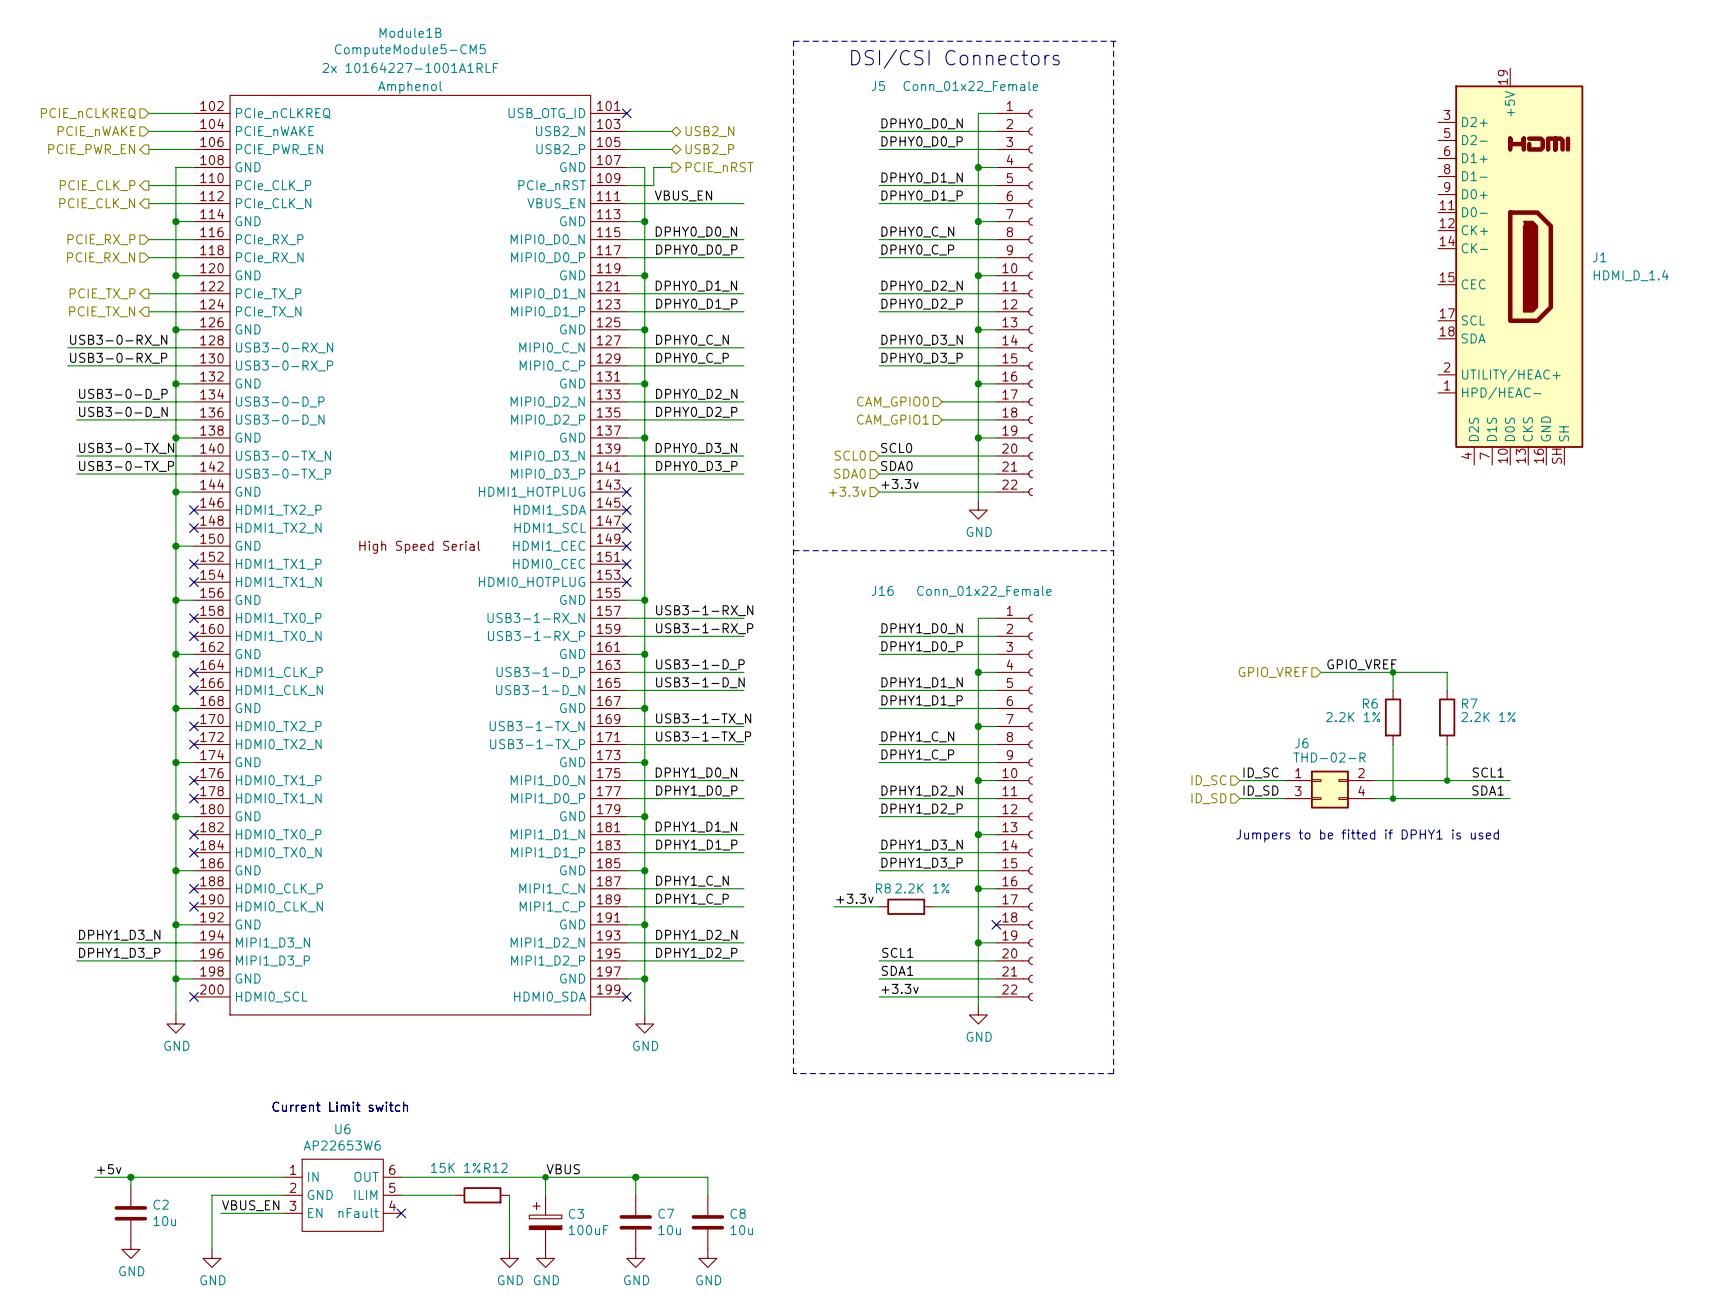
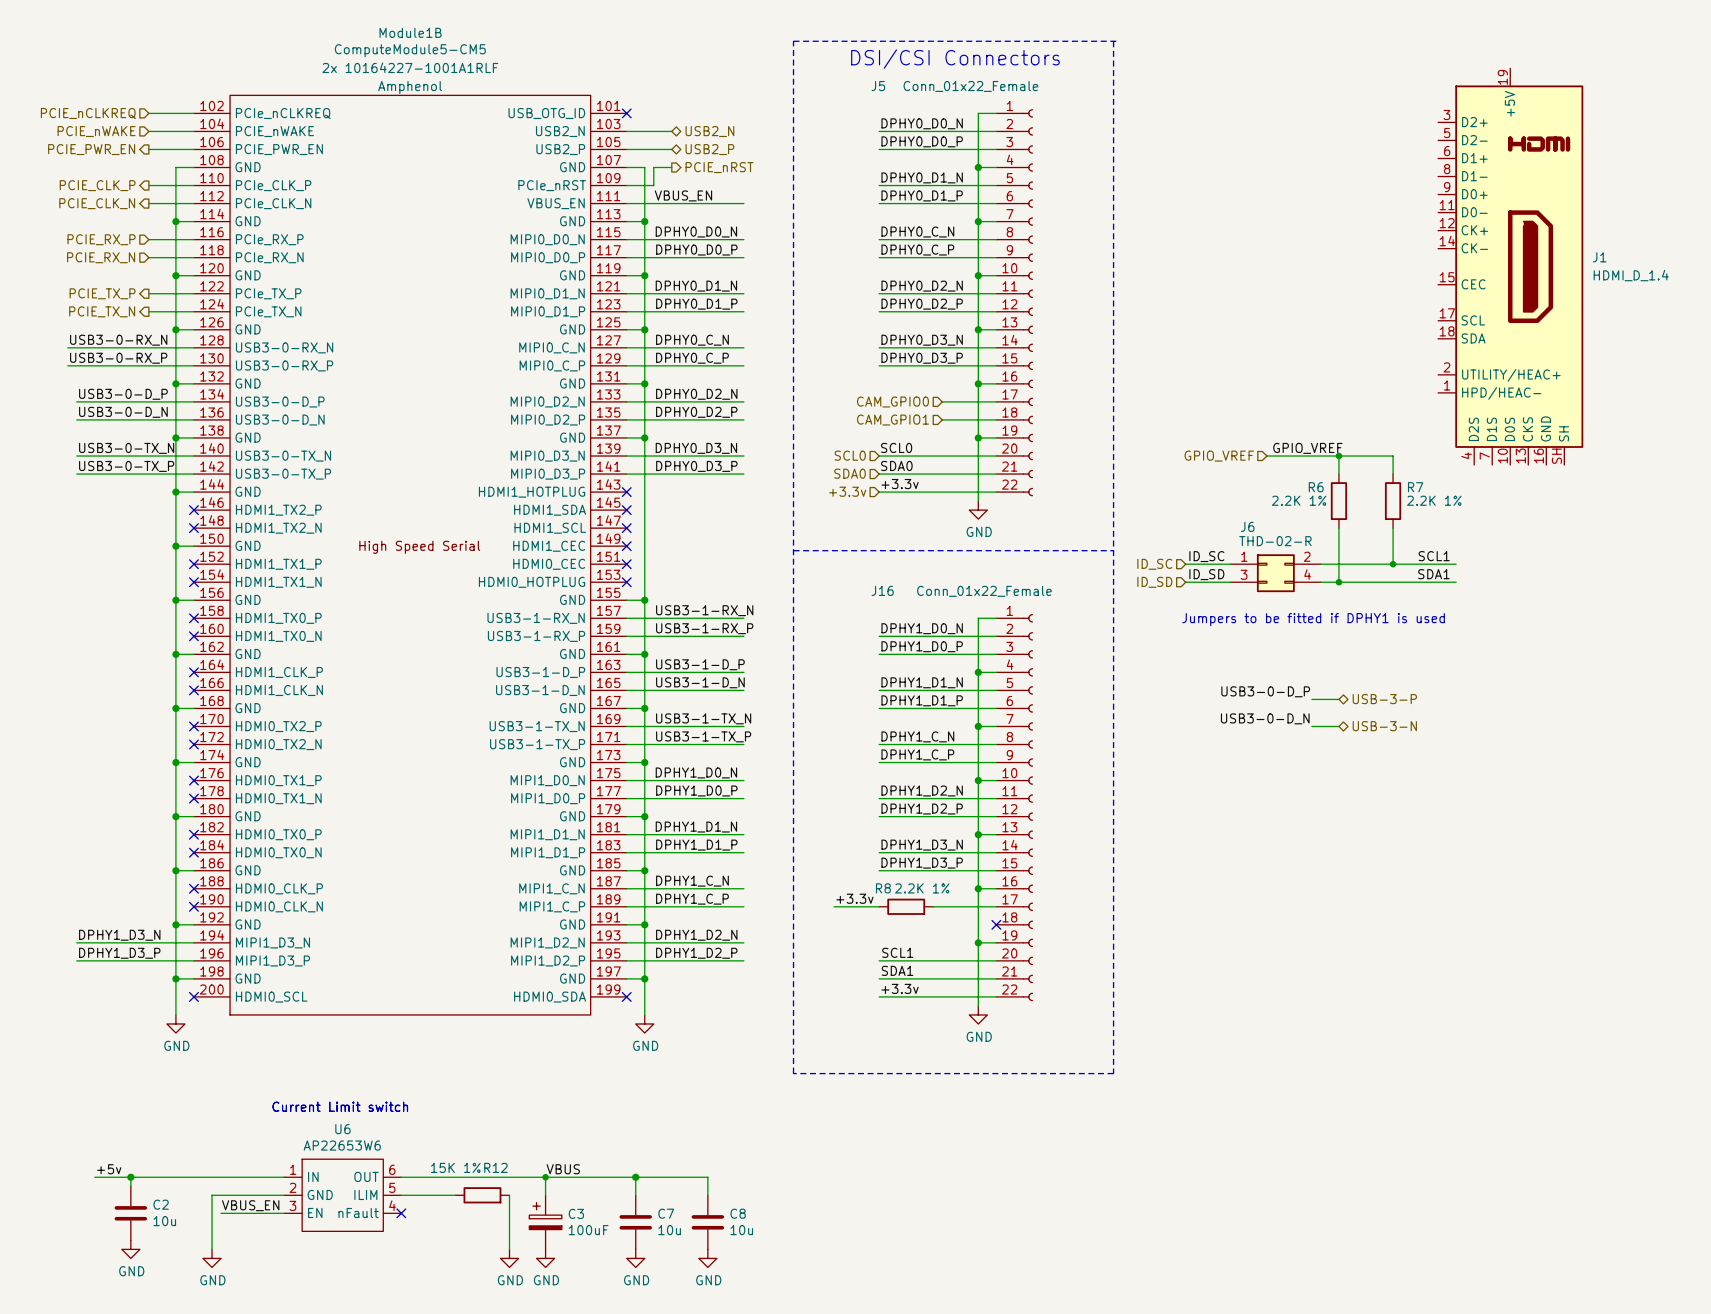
label: none -> GPIO_VREF (1307, 448)
hierarchical label: none -> GPIO_VREF (1219, 456)
wire: none -> (1266, 456) (1393, 456) (1393, 474)
wire: none -> (1338, 456) (1338, 474)
junction: none -> (1338, 456)
wire: none -> (1338, 528) (1338, 582)
wire: none -> (1393, 528) (1393, 564)
label: none -> ID_SC (1206, 556)
label: none -> SCL1 (1434, 556)
hierarchical label: none -> ID_SC (1154, 564)
wire: none -> (1185, 564) (1230, 564)
wire: none -> (1320, 564) (1456, 564)
junction: none -> (1393, 564)
label: none -> ID_SD (1206, 574)
label: none -> SDA1 (1433, 574)
hierarchical label: none -> ID_SD (1154, 582)
wire: none -> (1185, 582) (1230, 582)
wire: none -> (1320, 582) (1456, 582)
junction: none -> (1338, 582)
text: none -> Jumpers to be fitted if DPHY1 is used (1313, 619)
label: GPIO_VREF (1361, 664) -> none
hierarchical label: GPIO_VREF (1273, 672) -> none
wire: (1320, 672) (1447, 672) (1447, 690) -> none
wire: (1393, 672) (1393, 690) -> none
junction: (1393, 672) -> none
label: none -> USB3-0-D_P (1265, 691)
wire: none -> (1311, 699) (1338, 699)
hierarchical label: none -> USB-3-P (1384, 699)
R6 position: (1393, 717) -> (1338, 501)
R7 position: (1447, 717) -> (1393, 501)
label: none -> USB3-0-D_N (1265, 718)
wire: none -> (1311, 726) (1338, 726)
hierarchical label: none -> USB-3-N (1384, 726)
wire: (1393, 744) (1393, 798) -> none
wire: (1447, 744) (1447, 780) -> none
label: ID_SC (1260, 772) -> none
label: SCL1 (1488, 772) -> none
hierarchical label: ID_SC (1208, 780) -> none
wire: (1239, 780) (1284, 780) -> none
wire: (1375, 780) (1510, 780) -> none
junction: (1447, 780) -> none
J6 position: (1329, 789) -> (1275, 573)
label: ID_SD (1260, 790) -> none
label: SDA1 (1488, 790) -> none
hierarchical label: ID_SD (1208, 798) -> none
wire: (1239, 798) (1284, 798) -> none
wire: (1375, 798) (1510, 798) -> none
junction: (1393, 798) -> none
text: Jumpers to be fitted if DPHY1 is used (1367, 835) -> none

